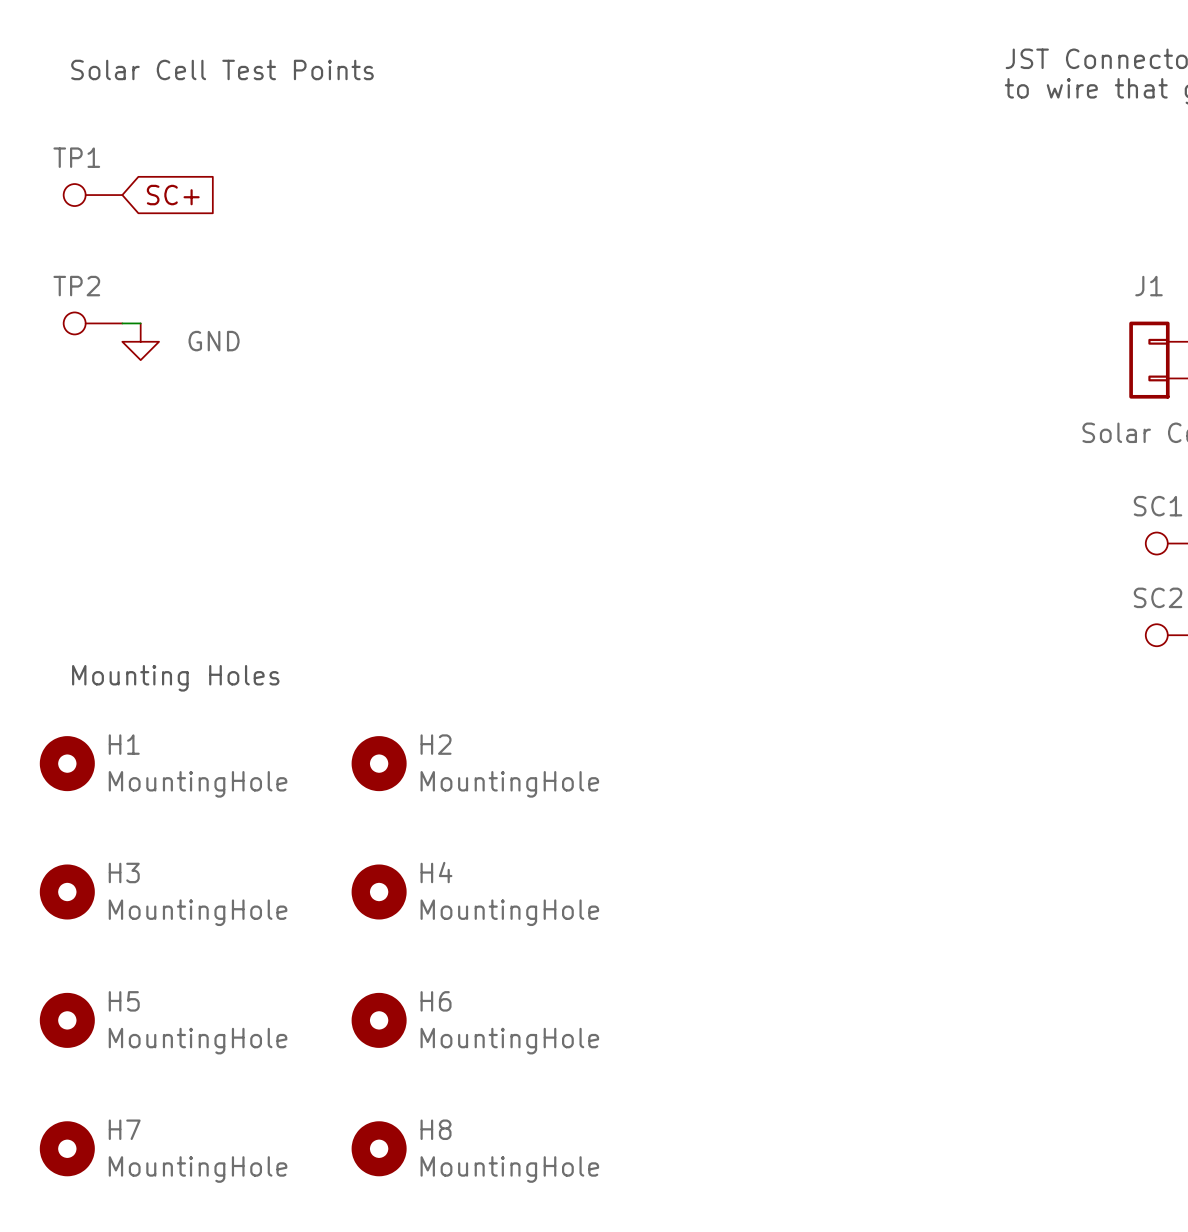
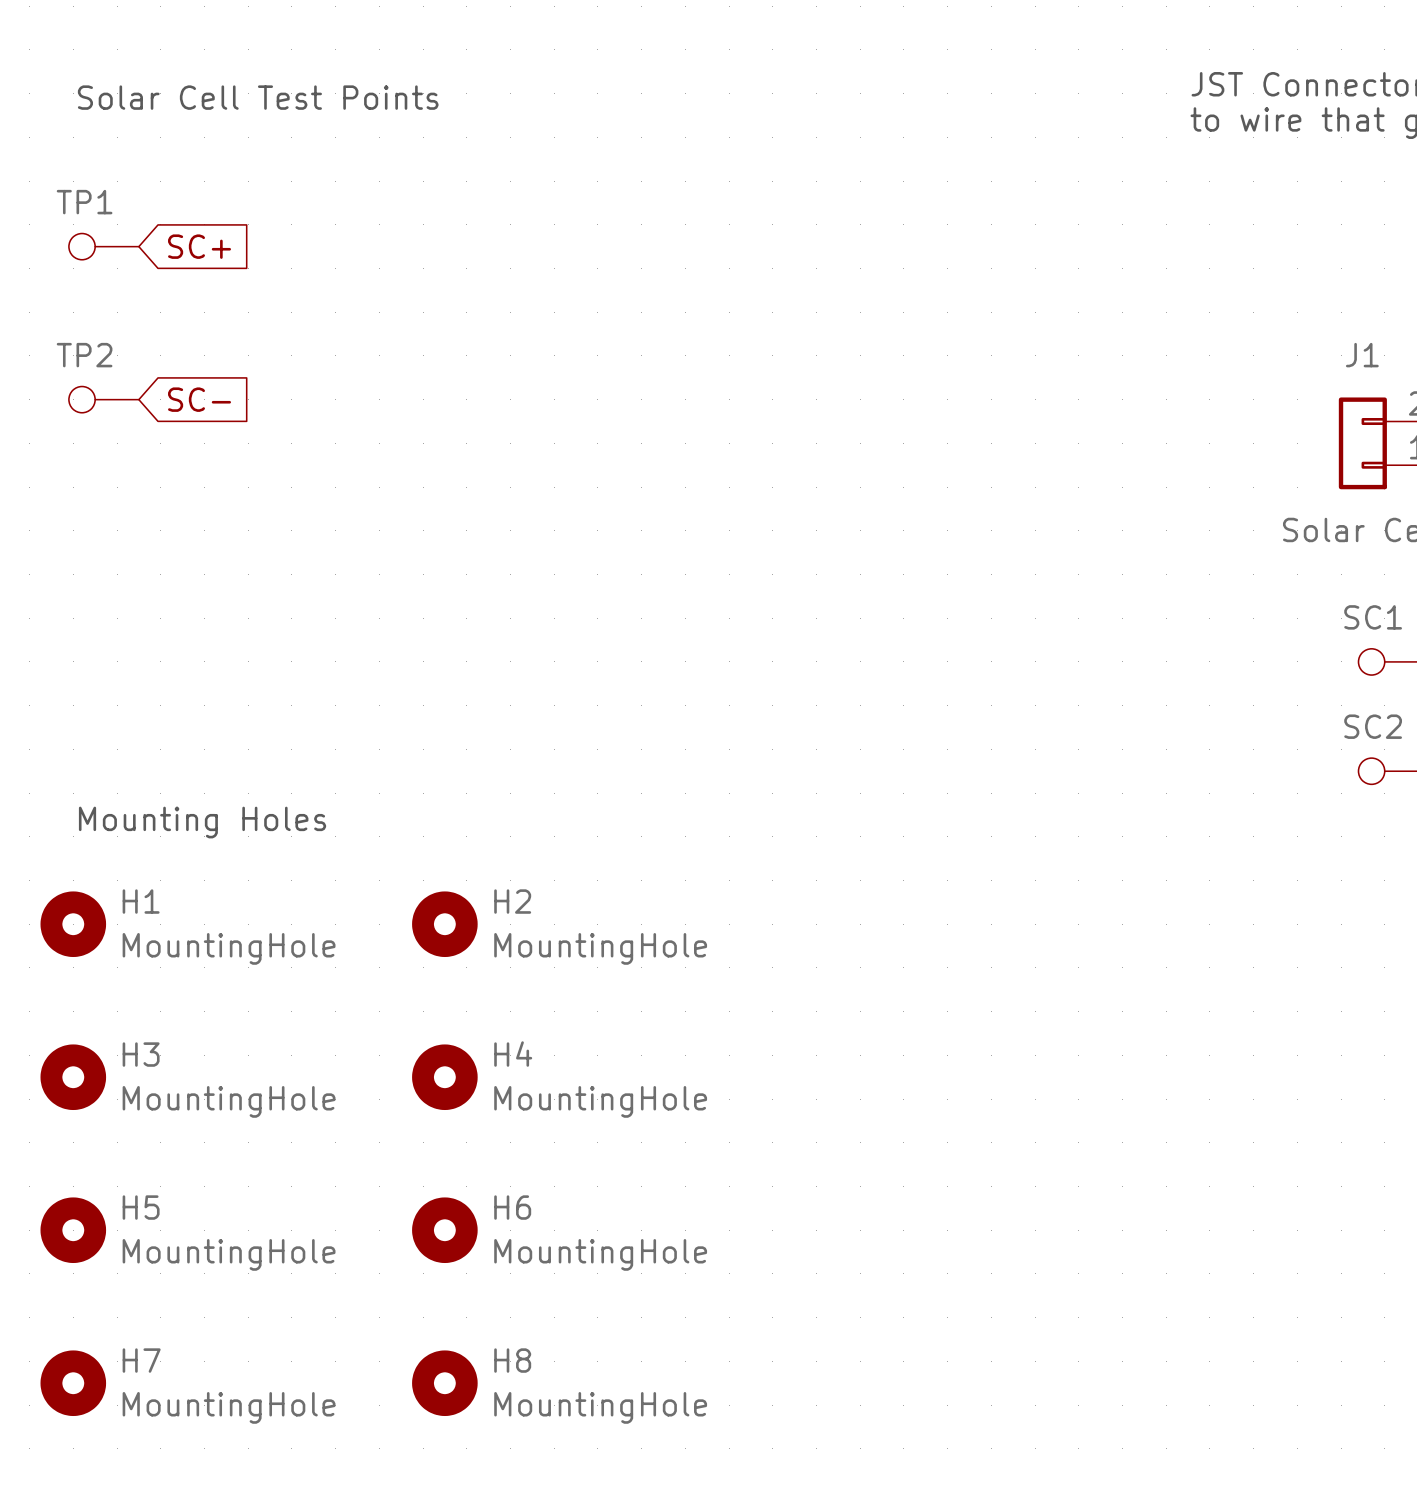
wire: (122, 323) (140, 323) -> none
global label: none -> SC- (199, 399)
power symbol: GND (140, 341) -> none

